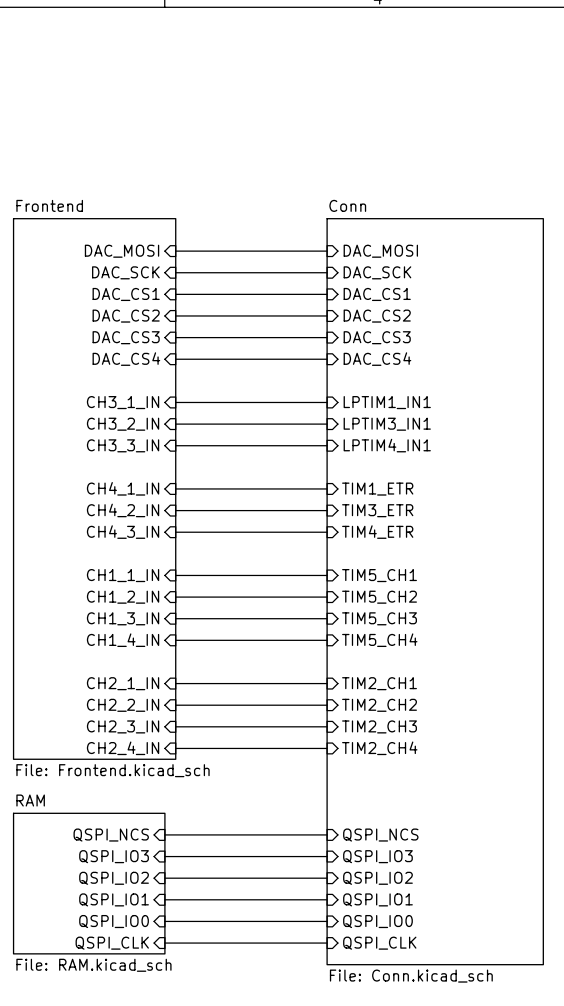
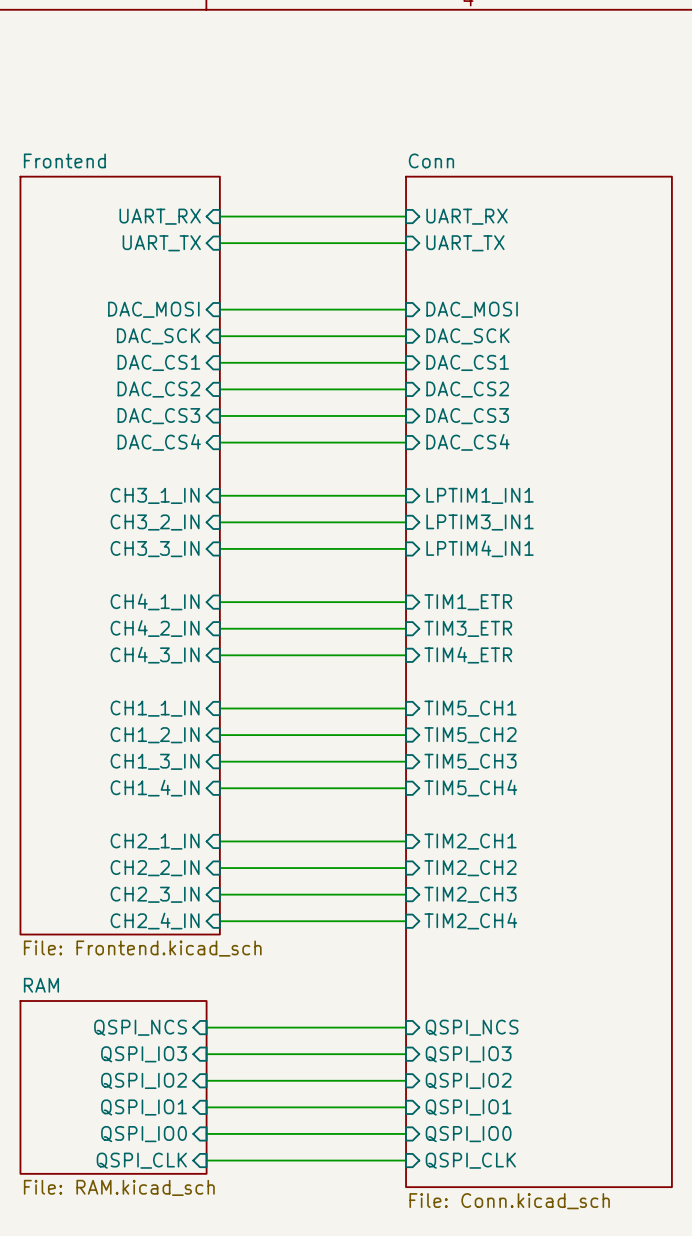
sheet pin: none -> UART_RX (160, 216)
wire: none -> (219, 216) (406, 216)
sheet pin: none -> UART_RX (467, 216)
sheet pin: none -> UART_TX (161, 243)
wire: none -> (219, 243) (406, 243)
sheet pin: none -> UART_TX (465, 243)
sheet Frontend: none -> File: Frontend.kicad_sch (120, 555)
sheet Frontend: File: Frontend.kicad_sch (94, 488) -> none
sheet Conn: none -> File: Conn.kicad_sch (538, 681)
sheet Conn: File: Conn.kicad_sch (435, 591) -> none

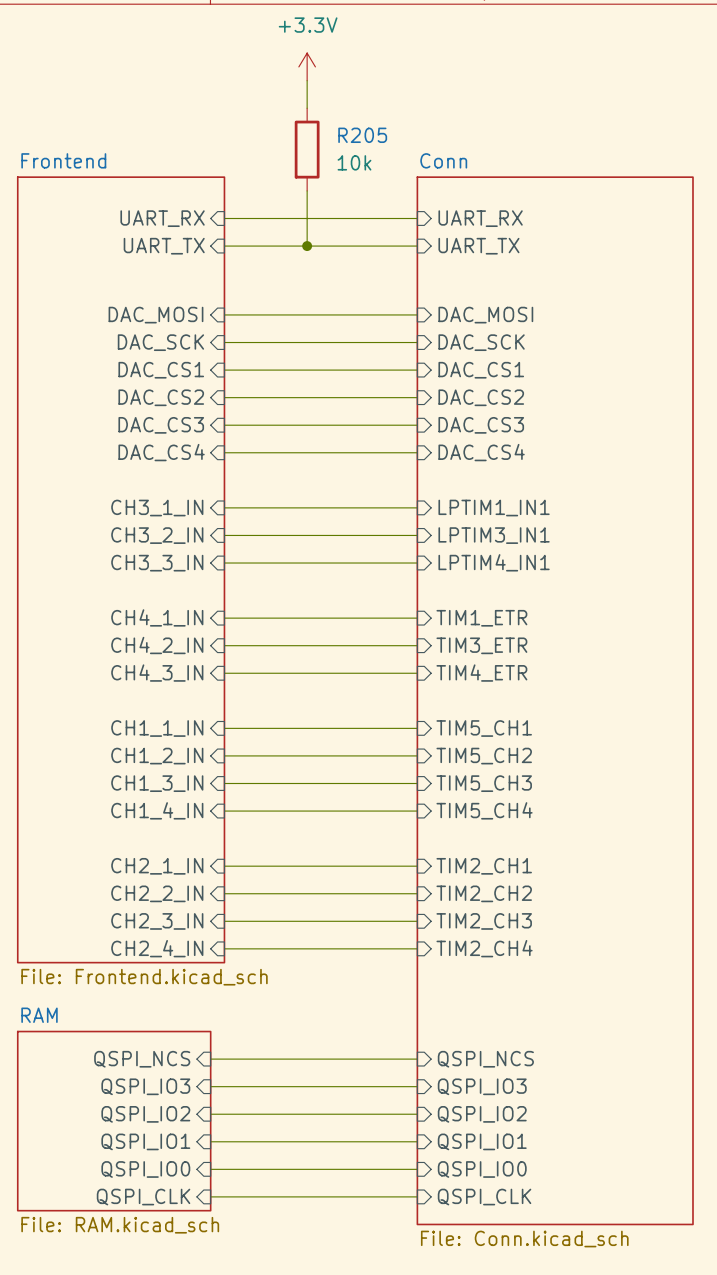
power symbol: none -> +3.3V (307, 66)
wire: none -> (307, 80) (307, 108)
R205: none -> 10k (307, 149)
wire: none -> (307, 190) (307, 246)
junction: none -> (307, 246)

